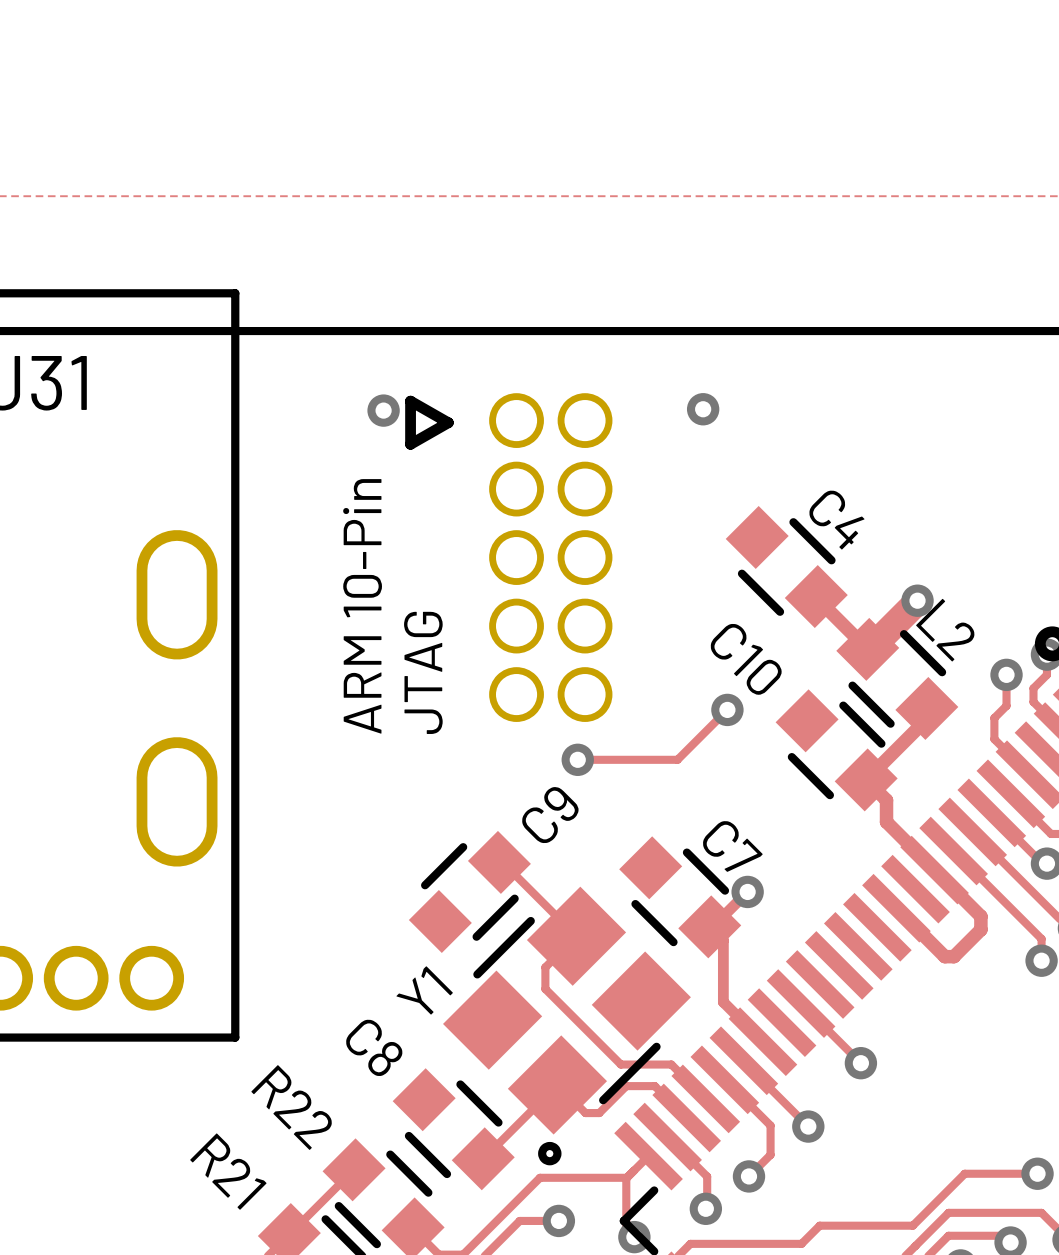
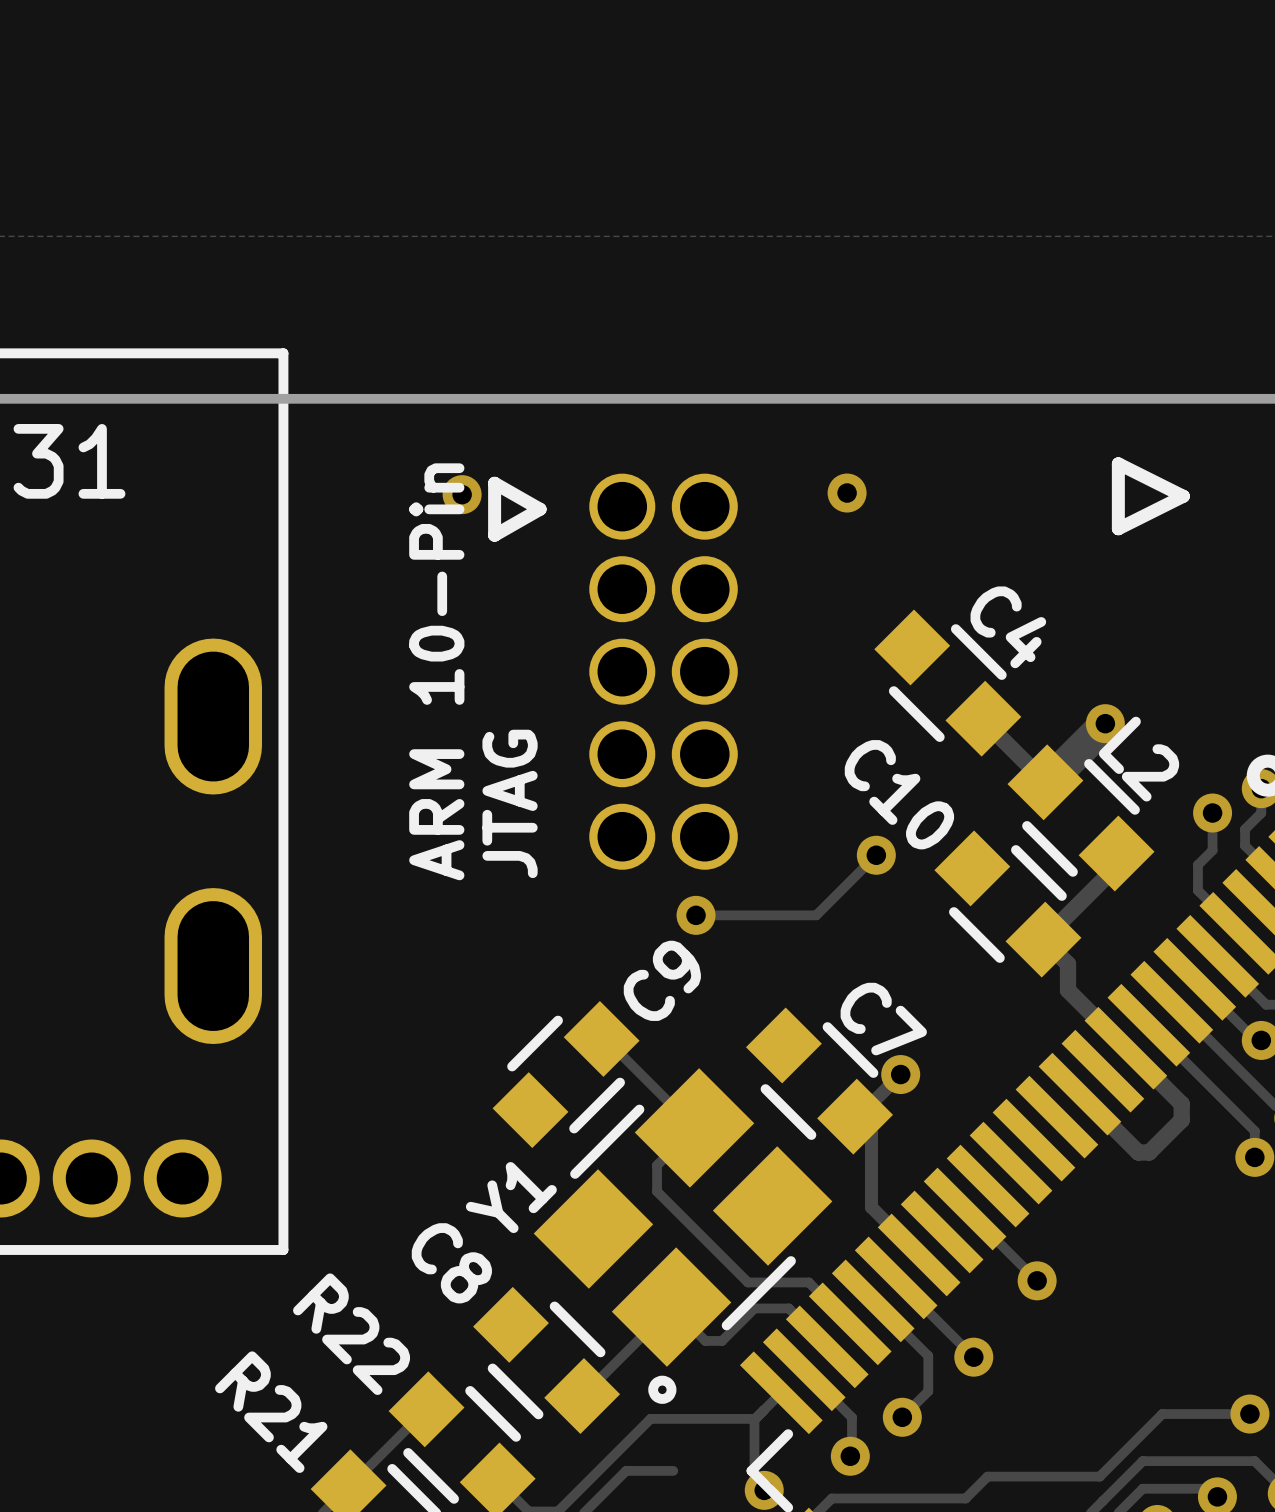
line: none -> (1118, 463) (1118, 528) (1183, 496) (1118, 463)
via: (558, 1220) -> none

